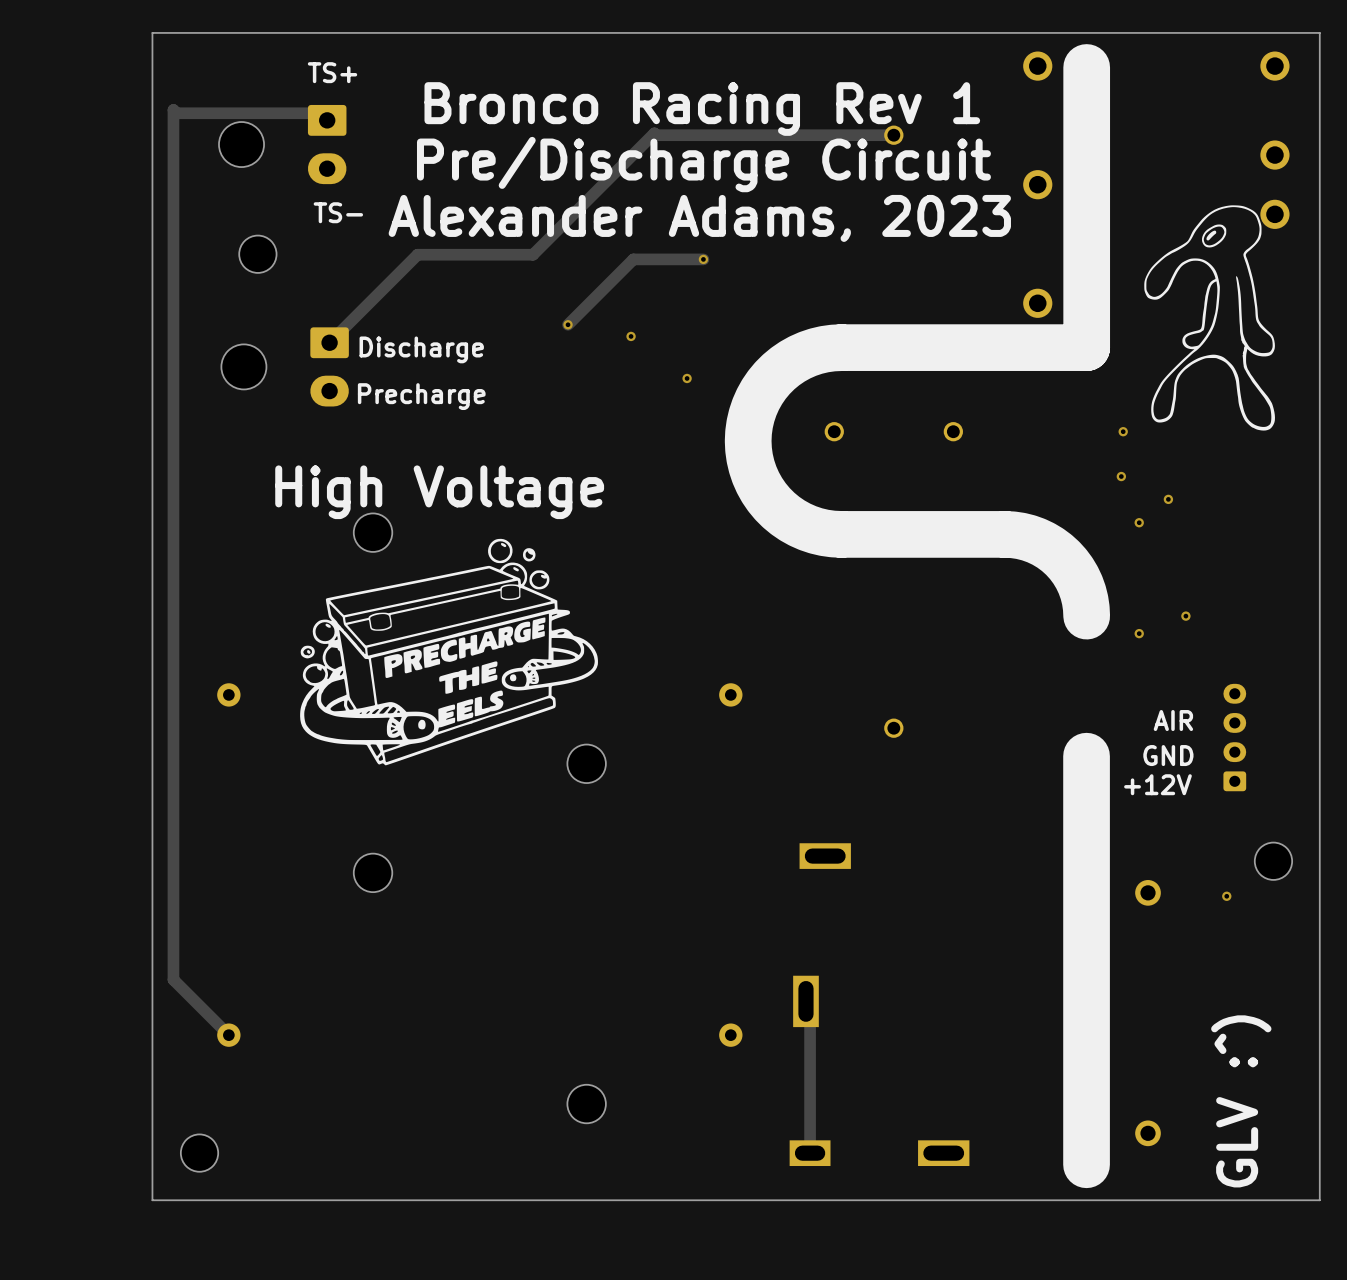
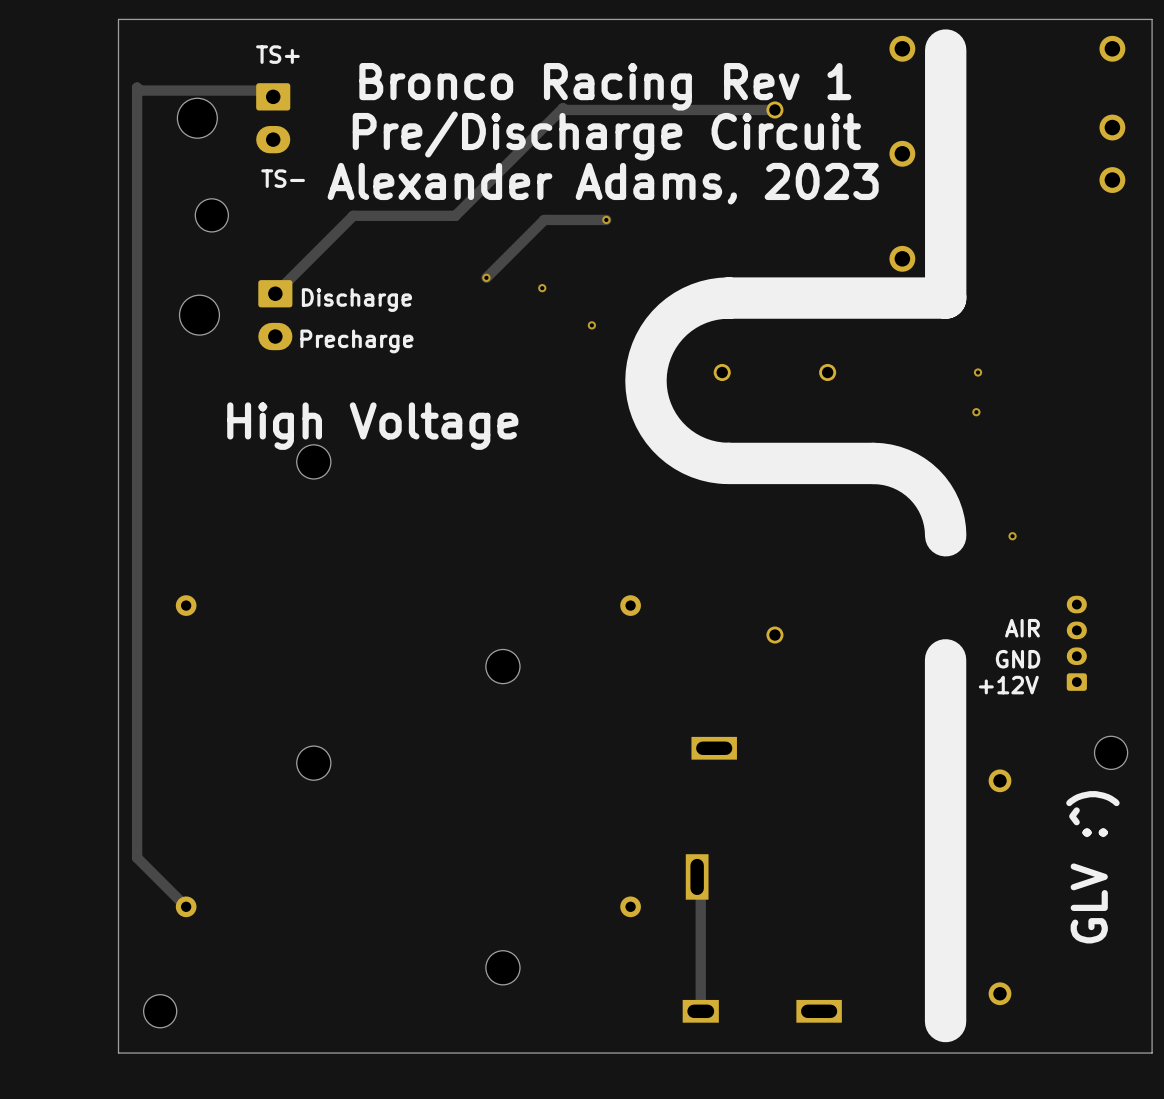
drawing: [1144, 205, 1275, 431] -> none
via: (1168, 499) -> none
via: (1139, 522) -> none
drawing: [300, 538, 598, 766] -> none
via: none -> (1012, 536)
via: (1185, 616) -> none
via: (1139, 633) -> none
via: (1226, 896) -> none
text position: GLV :^) (1241, 1101) -> GLV :^) (1092, 867)

